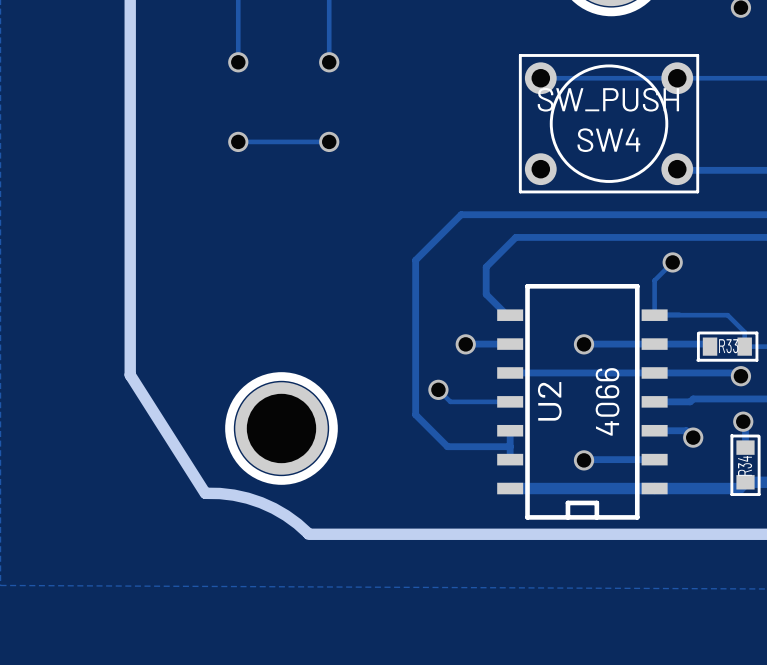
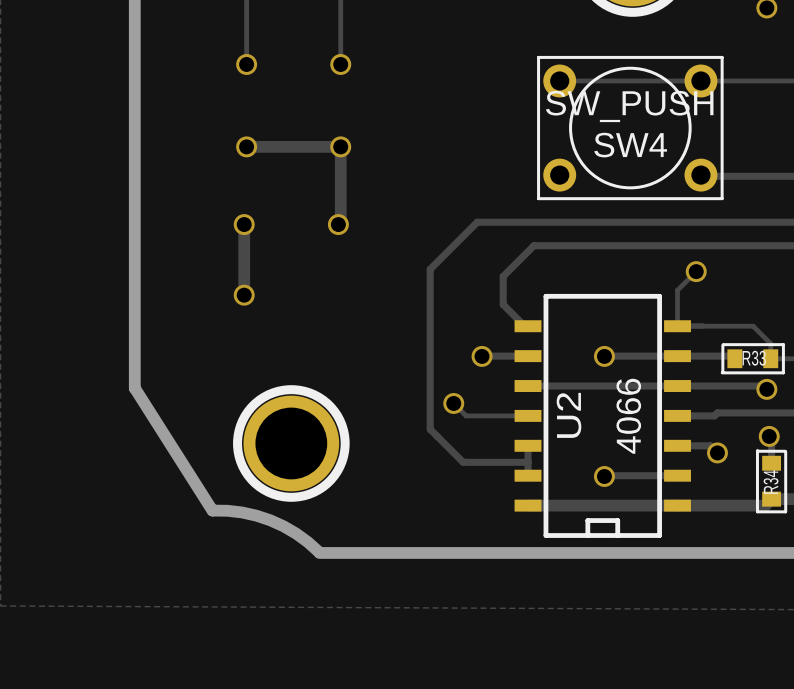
track width: thin (238, 141) (329, 141) -> thick (246, 146) (340, 146)
track: none -> (340, 146) (340, 222) (338, 224)
track: none -> (244, 224) (244, 295)
via: none -> (244, 224)
via: none -> (338, 224)
via: none -> (244, 295)

